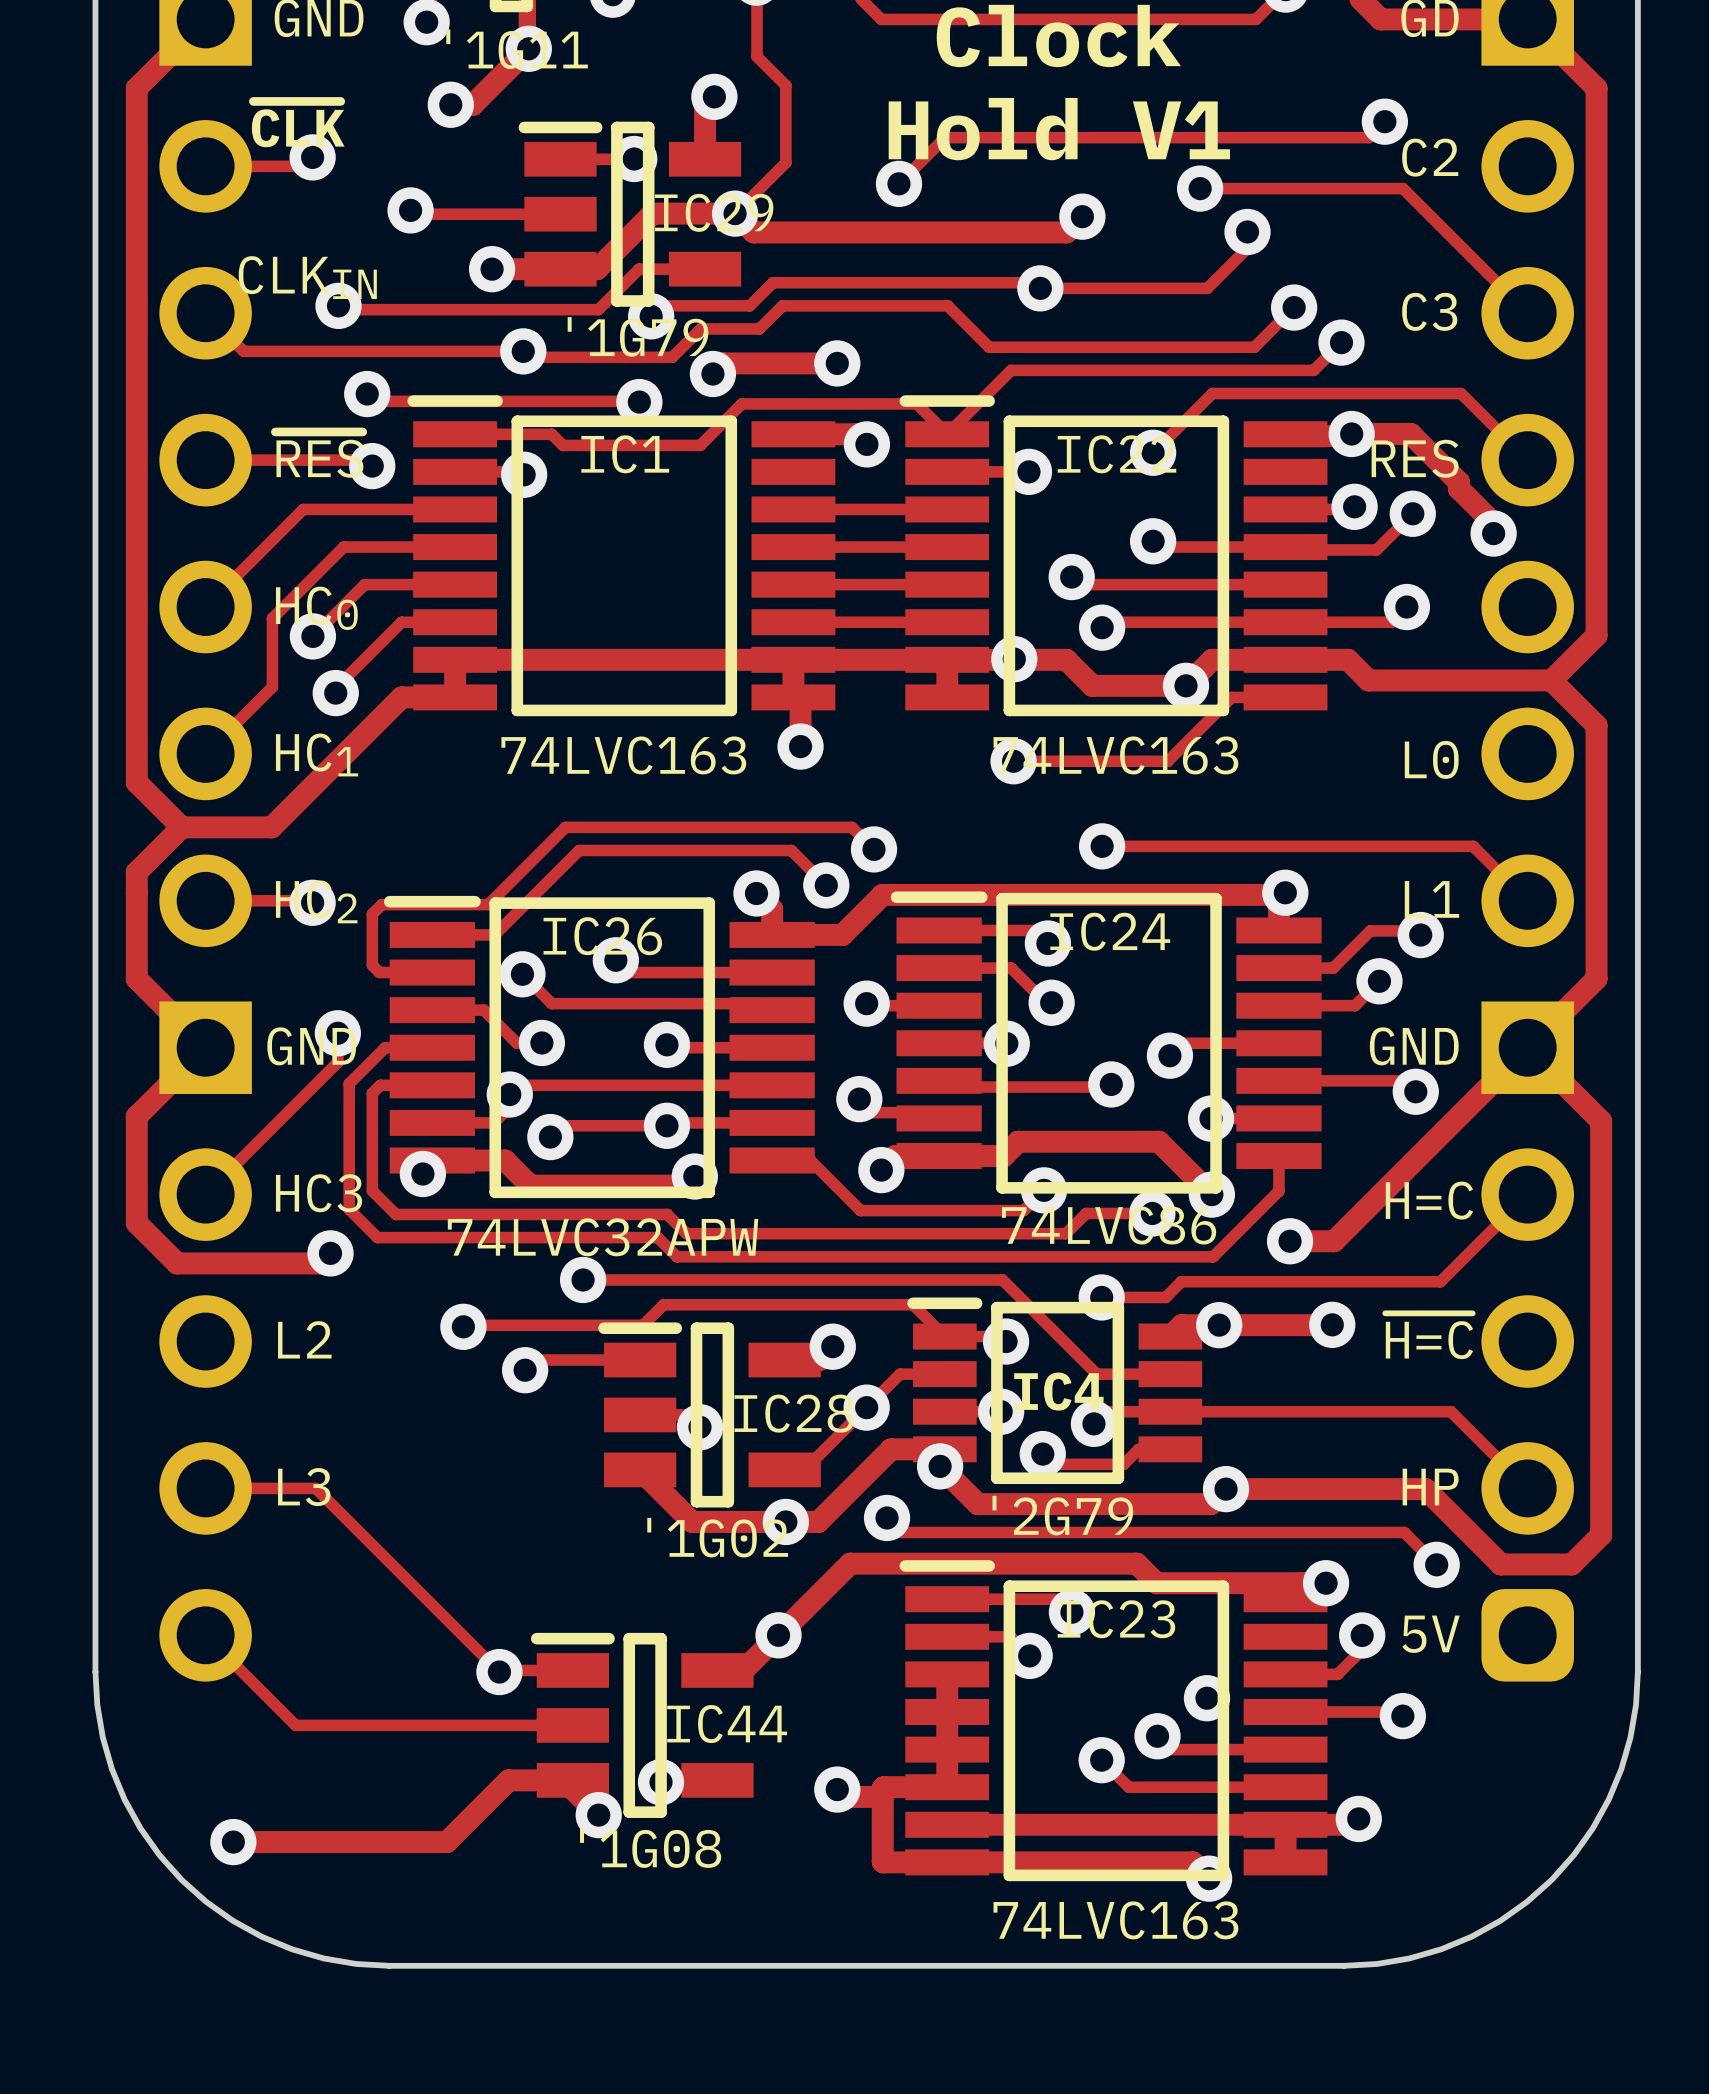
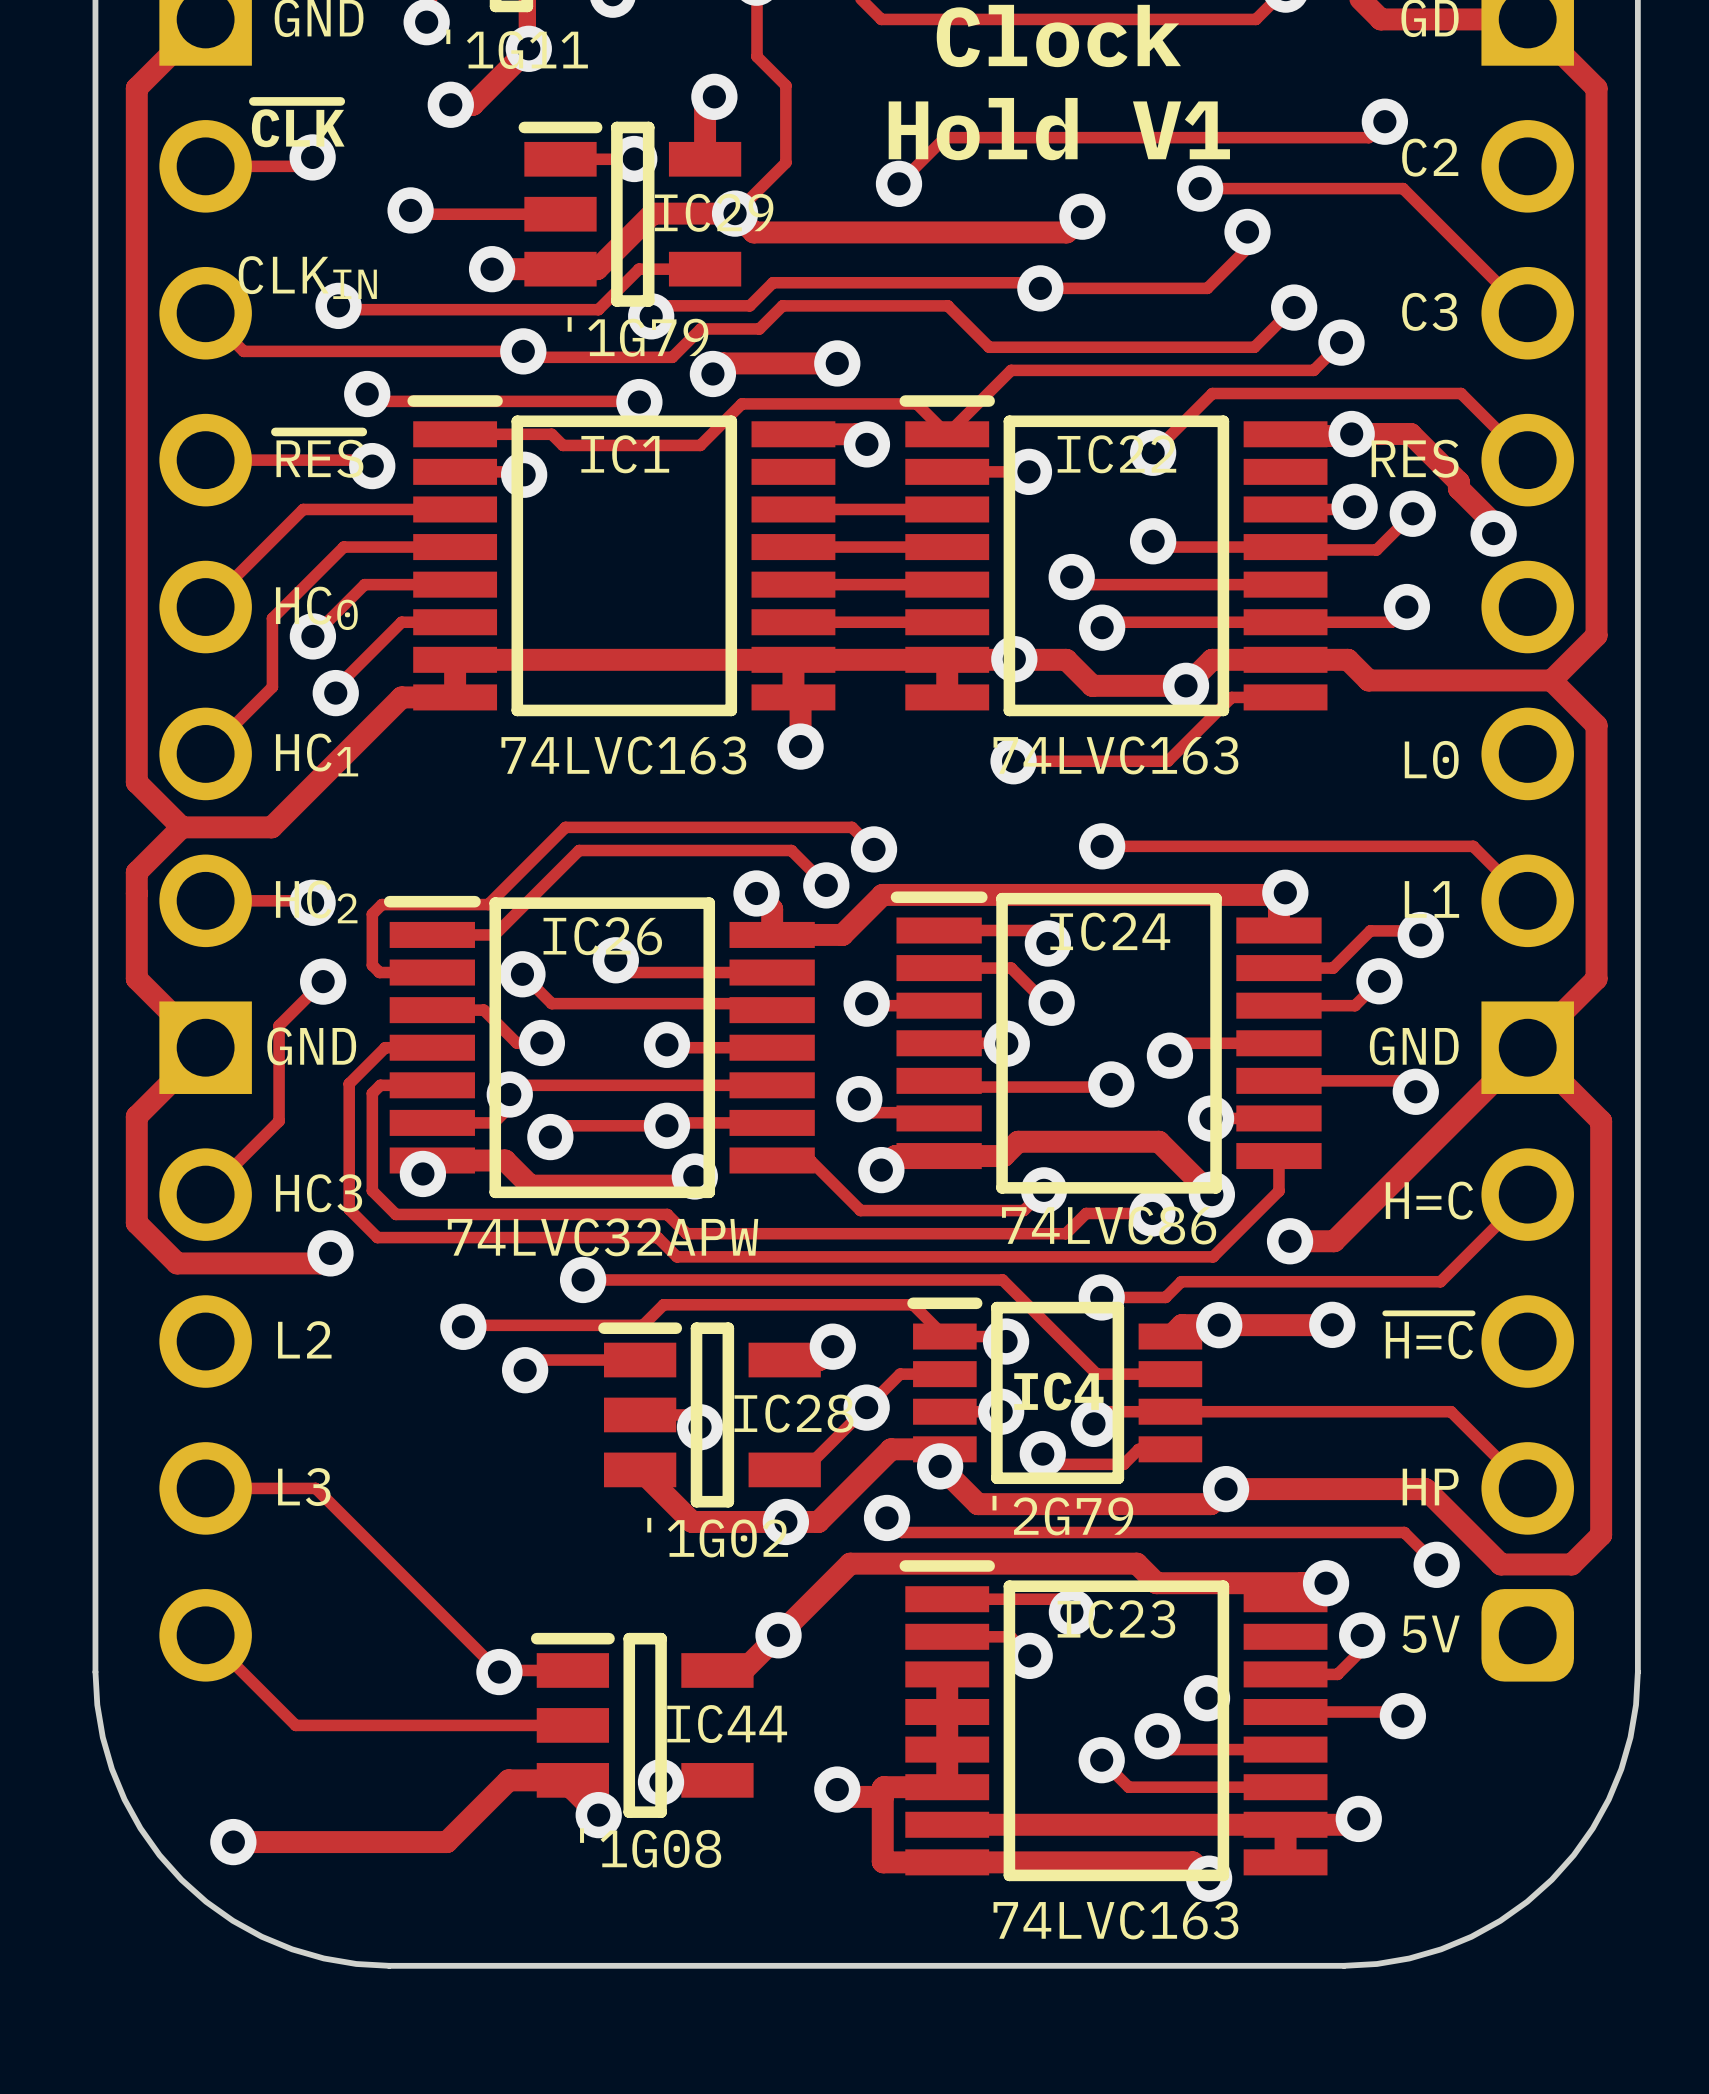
track: (337, 1033) (337, 1062) (279, 1121) -> (323, 981) (279, 1025) (279, 1121)
via position: (337, 1033) -> (323, 981)

